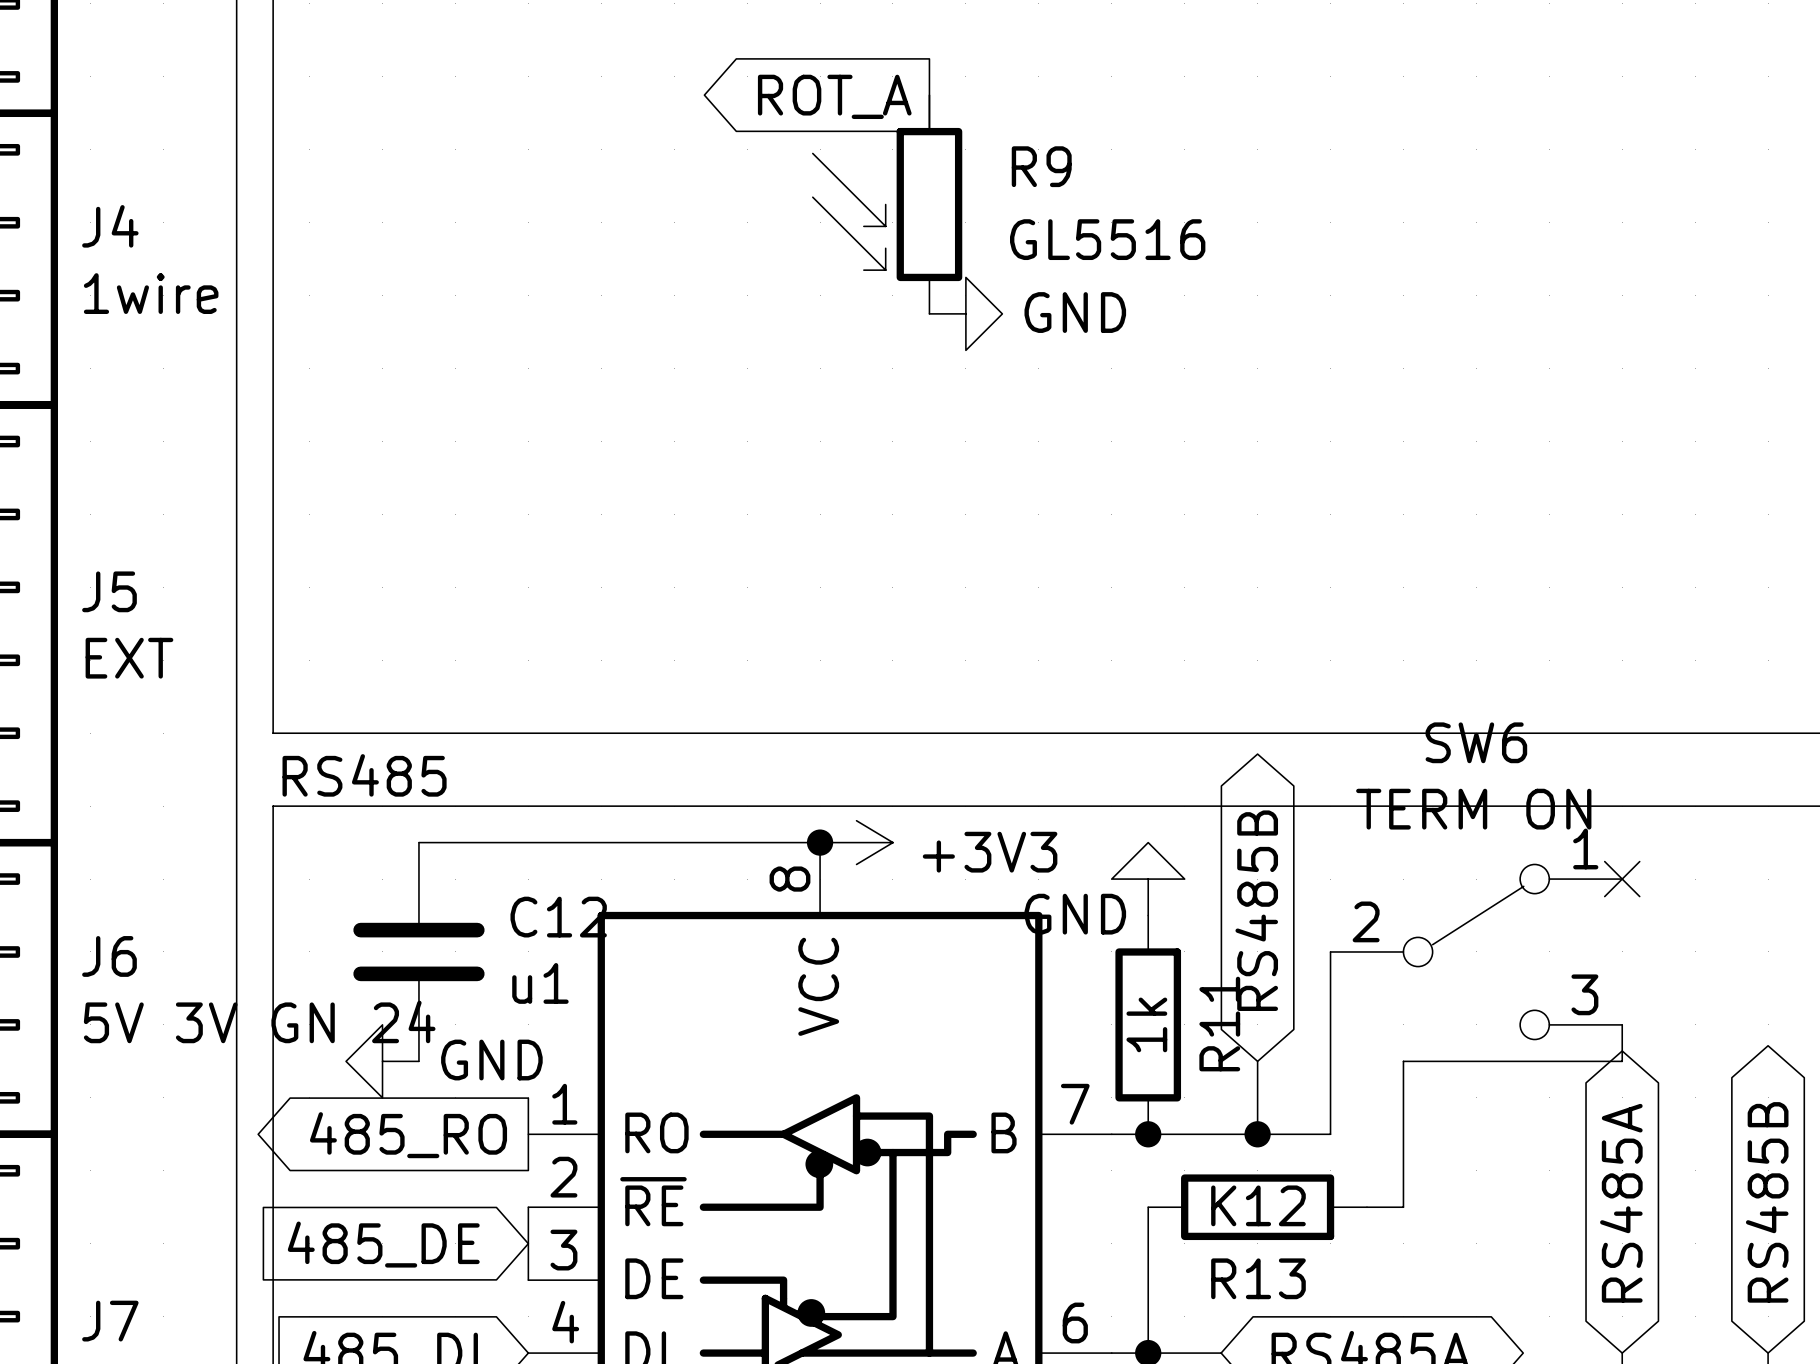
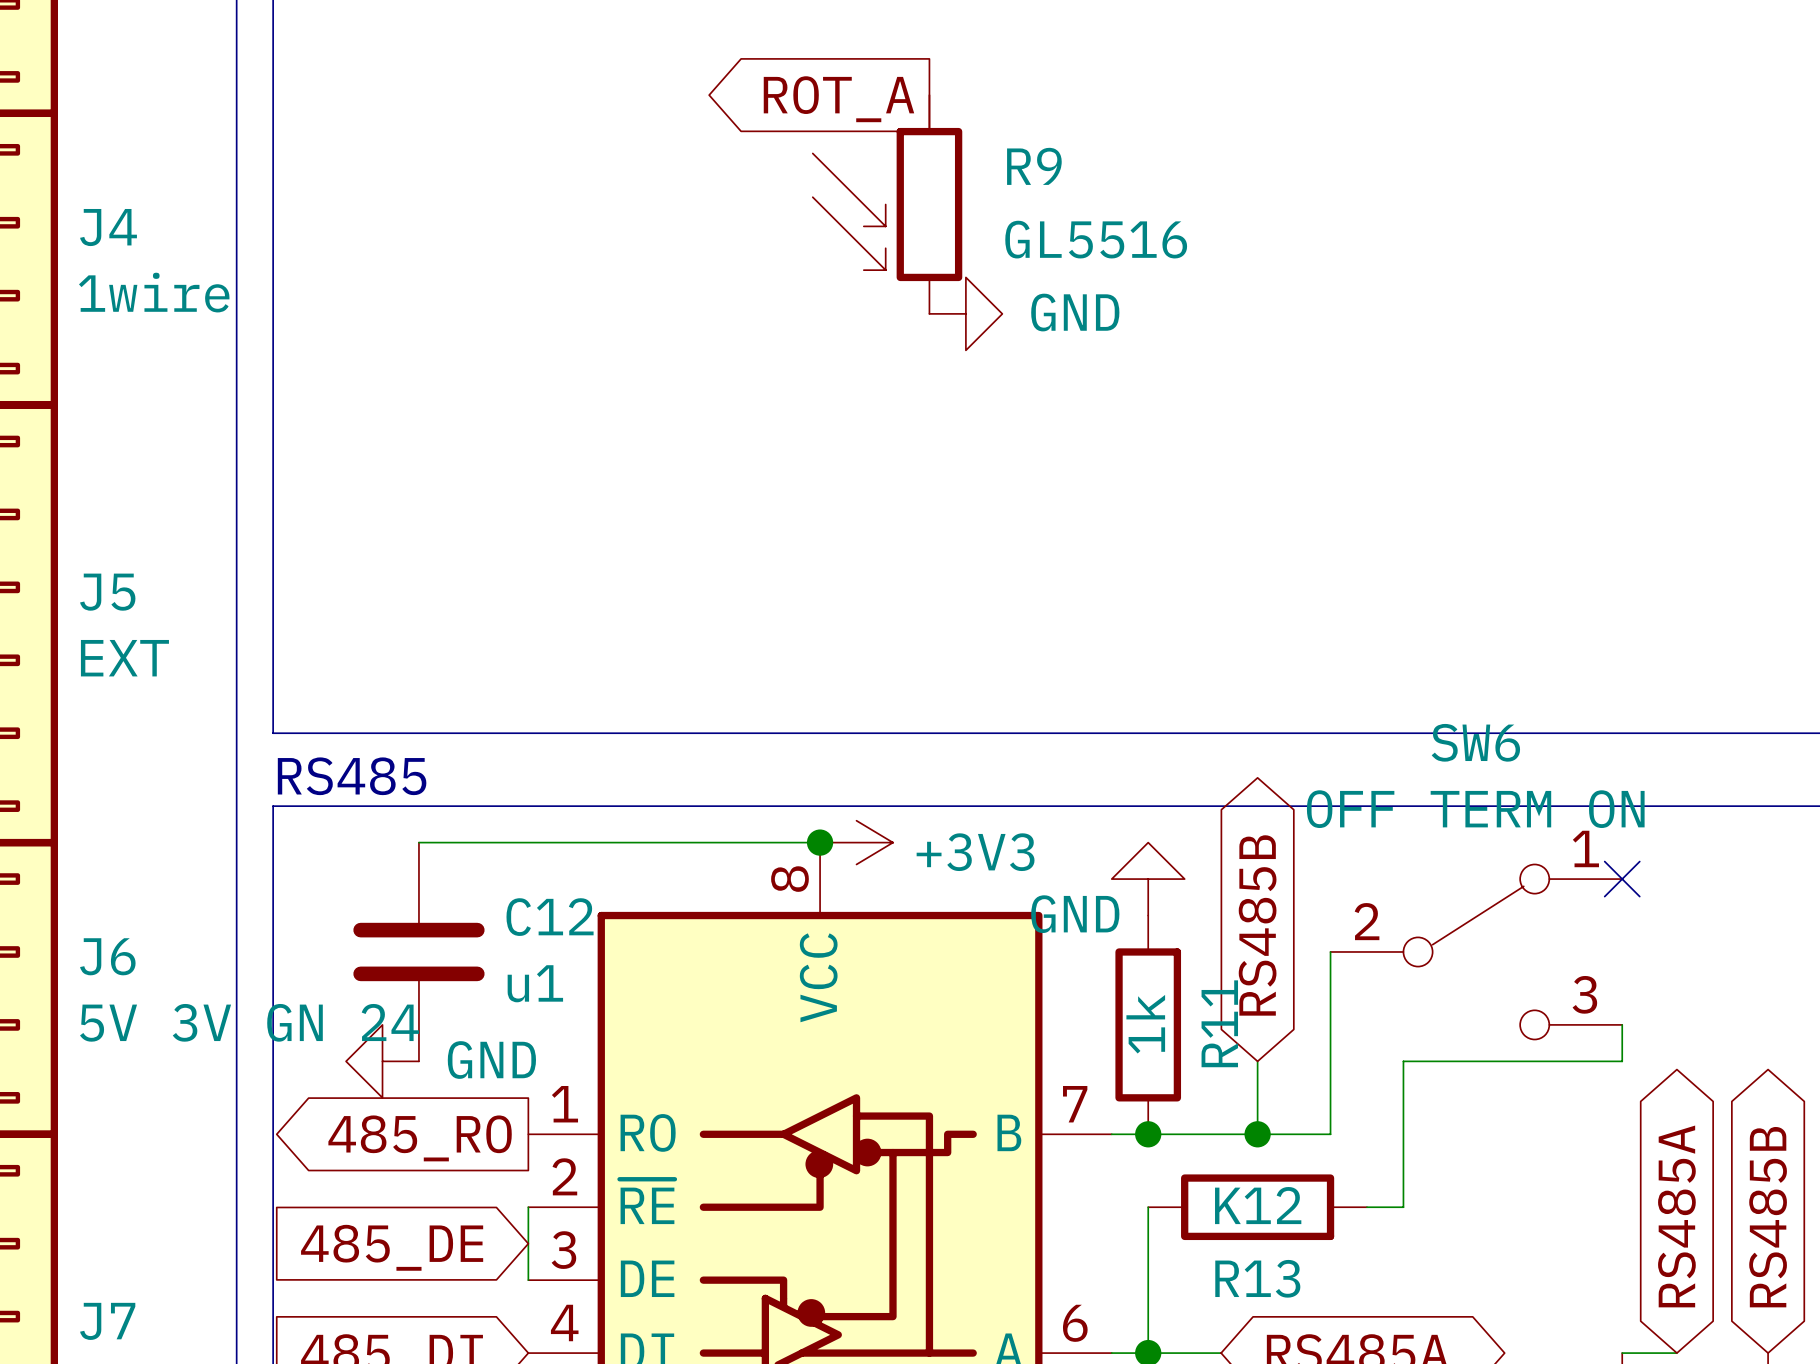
SW6 value: TERM ON (1473, 809) -> OFF TERM ON (1475, 809)
global label position: RS485A (1621, 1203) -> RS485A (1676, 1216)
wire: none -> (1622, 1353) (1676, 1353)

